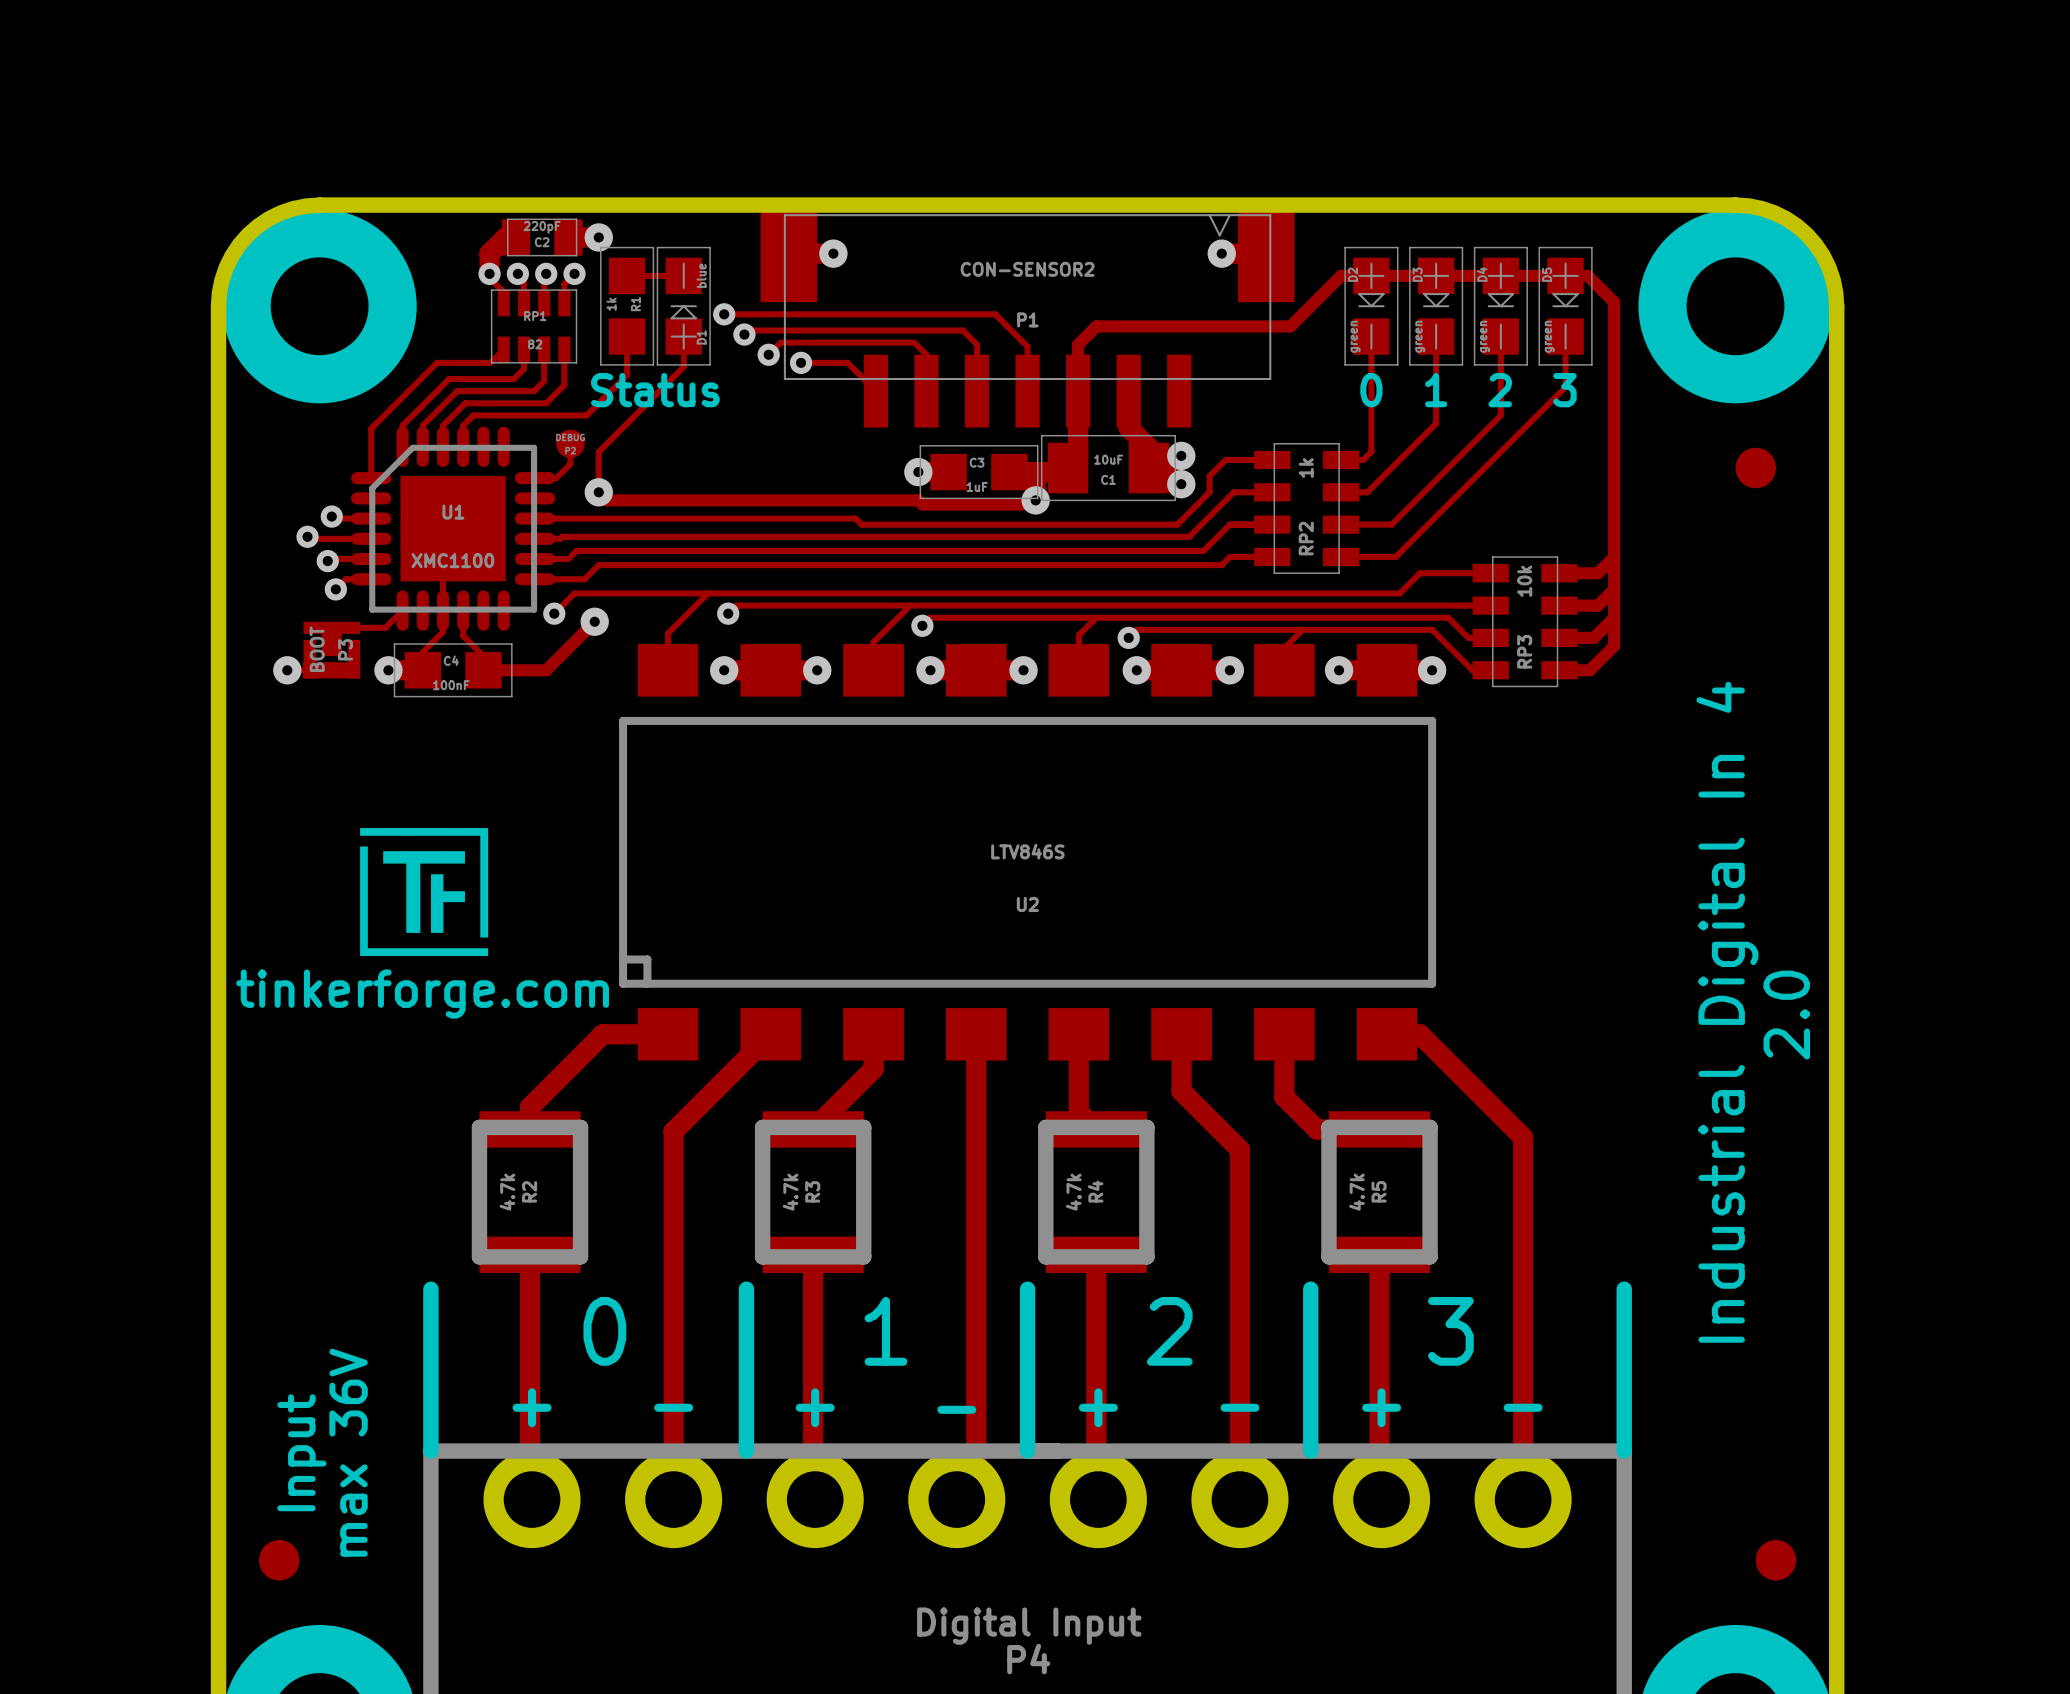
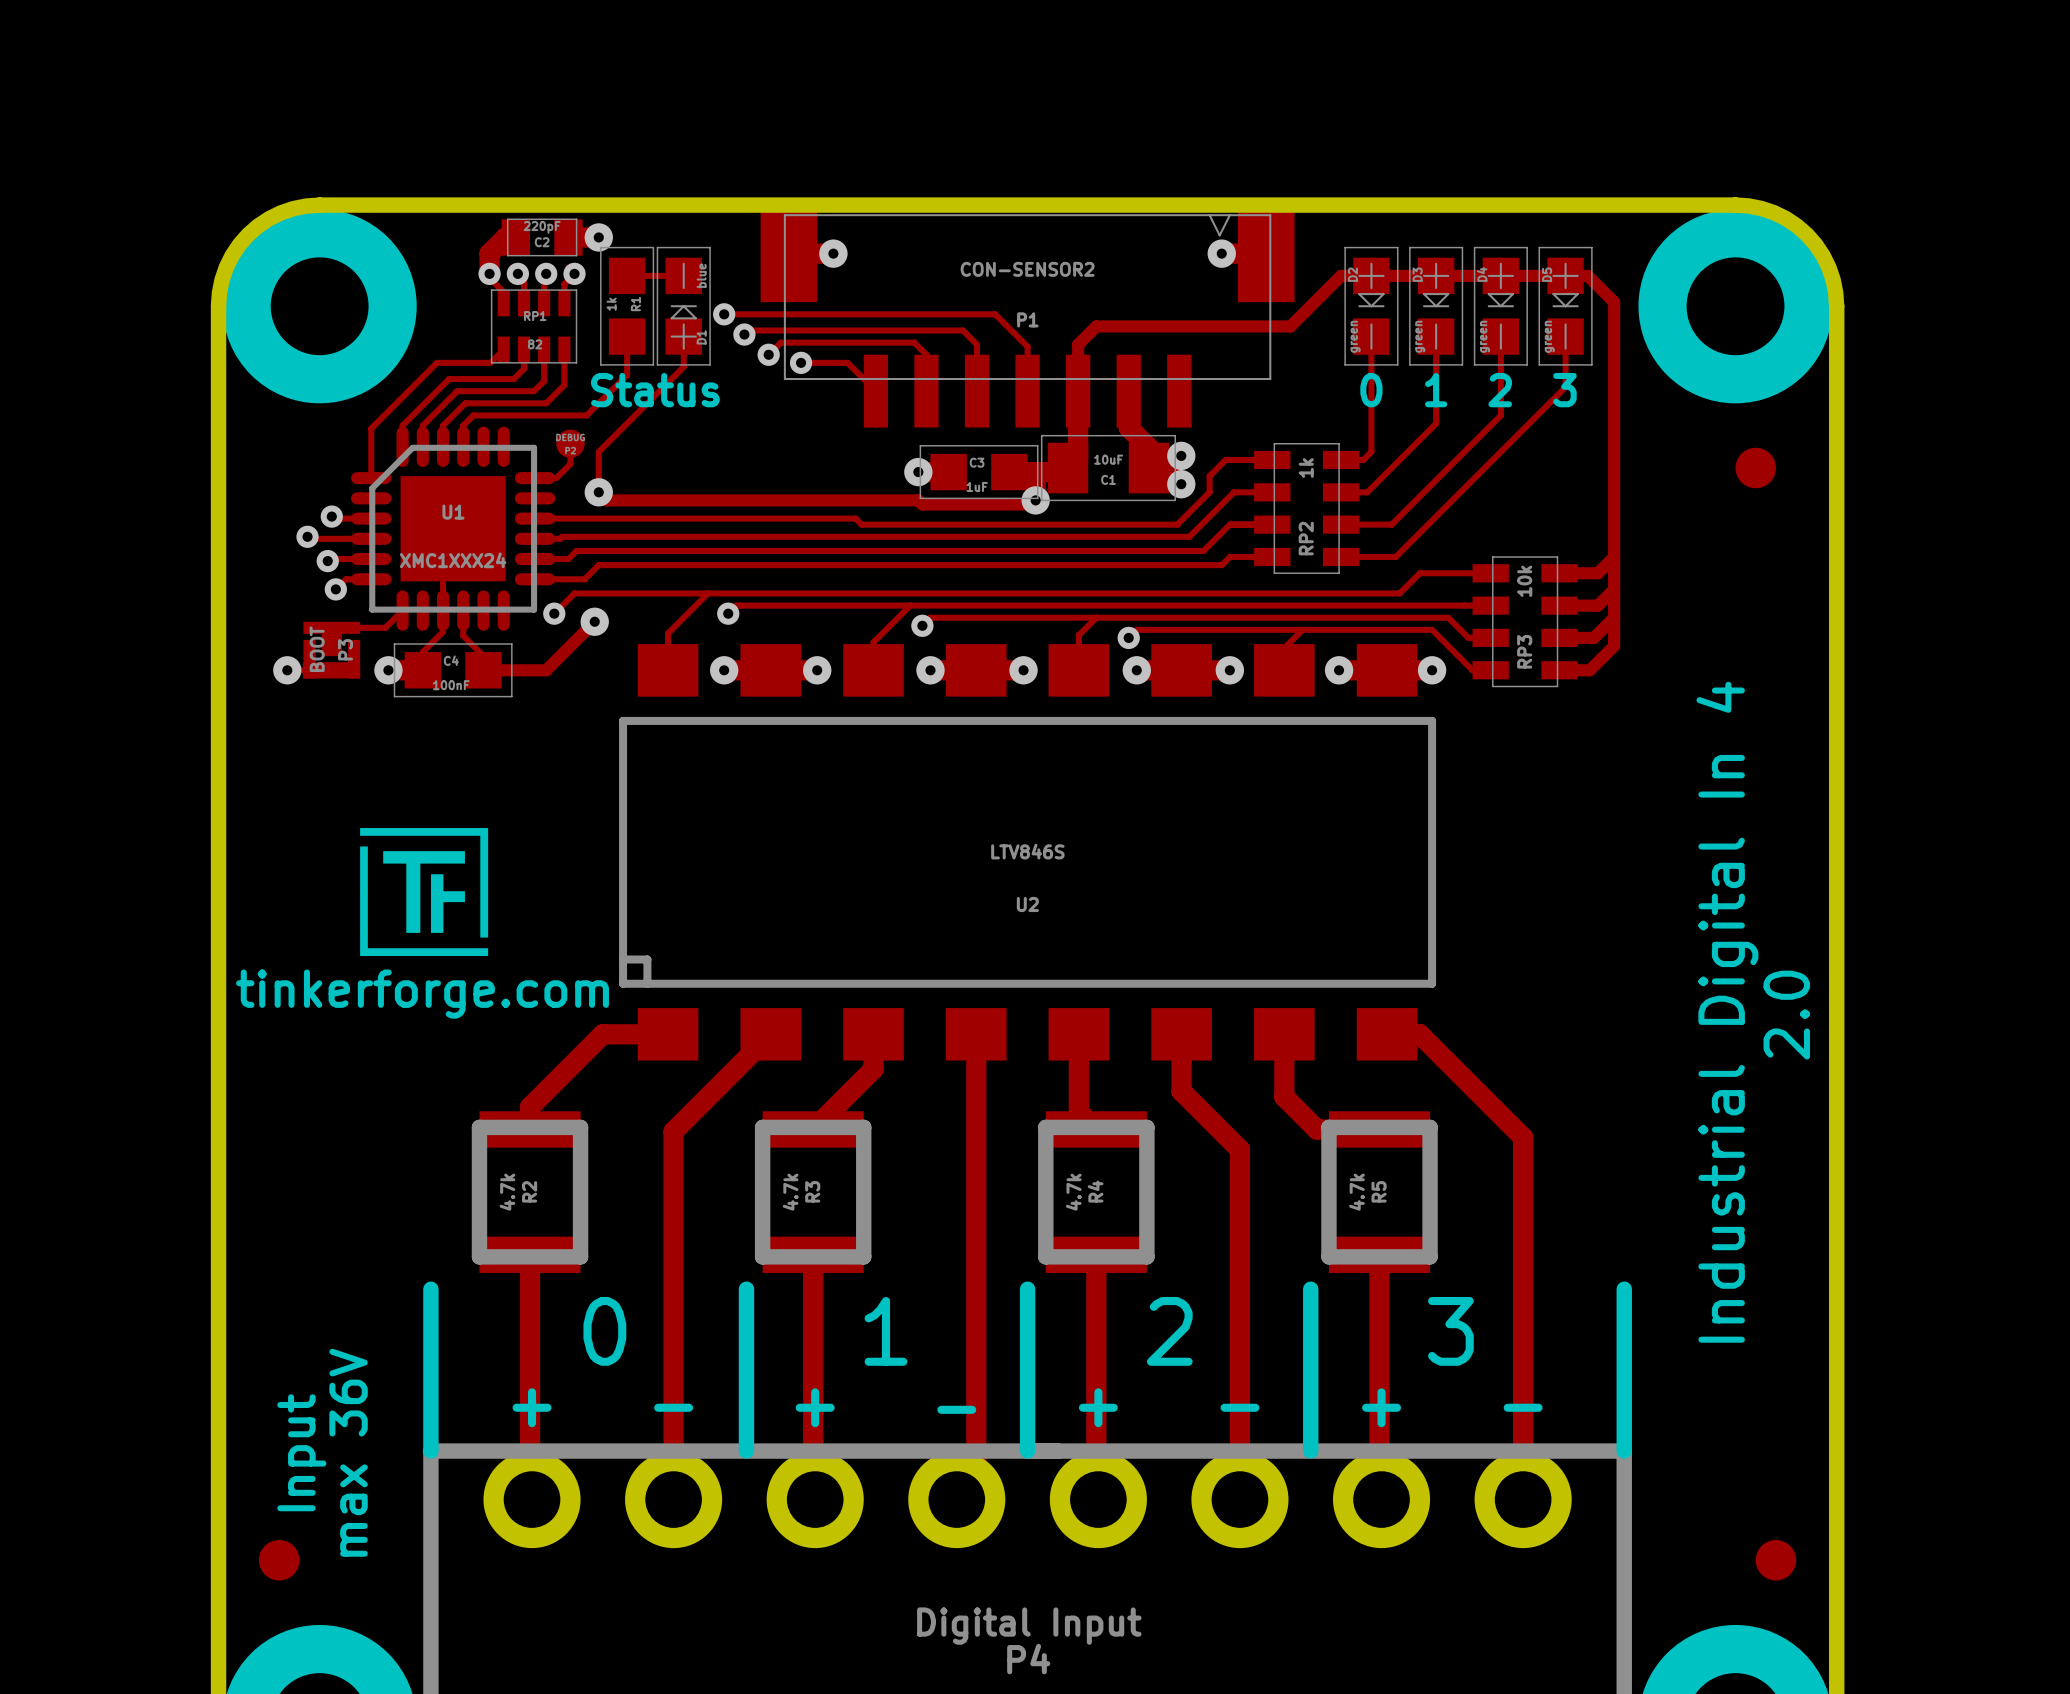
U1 value: XMC1100 (452, 560) -> XMC1XXX24 (453, 560)

